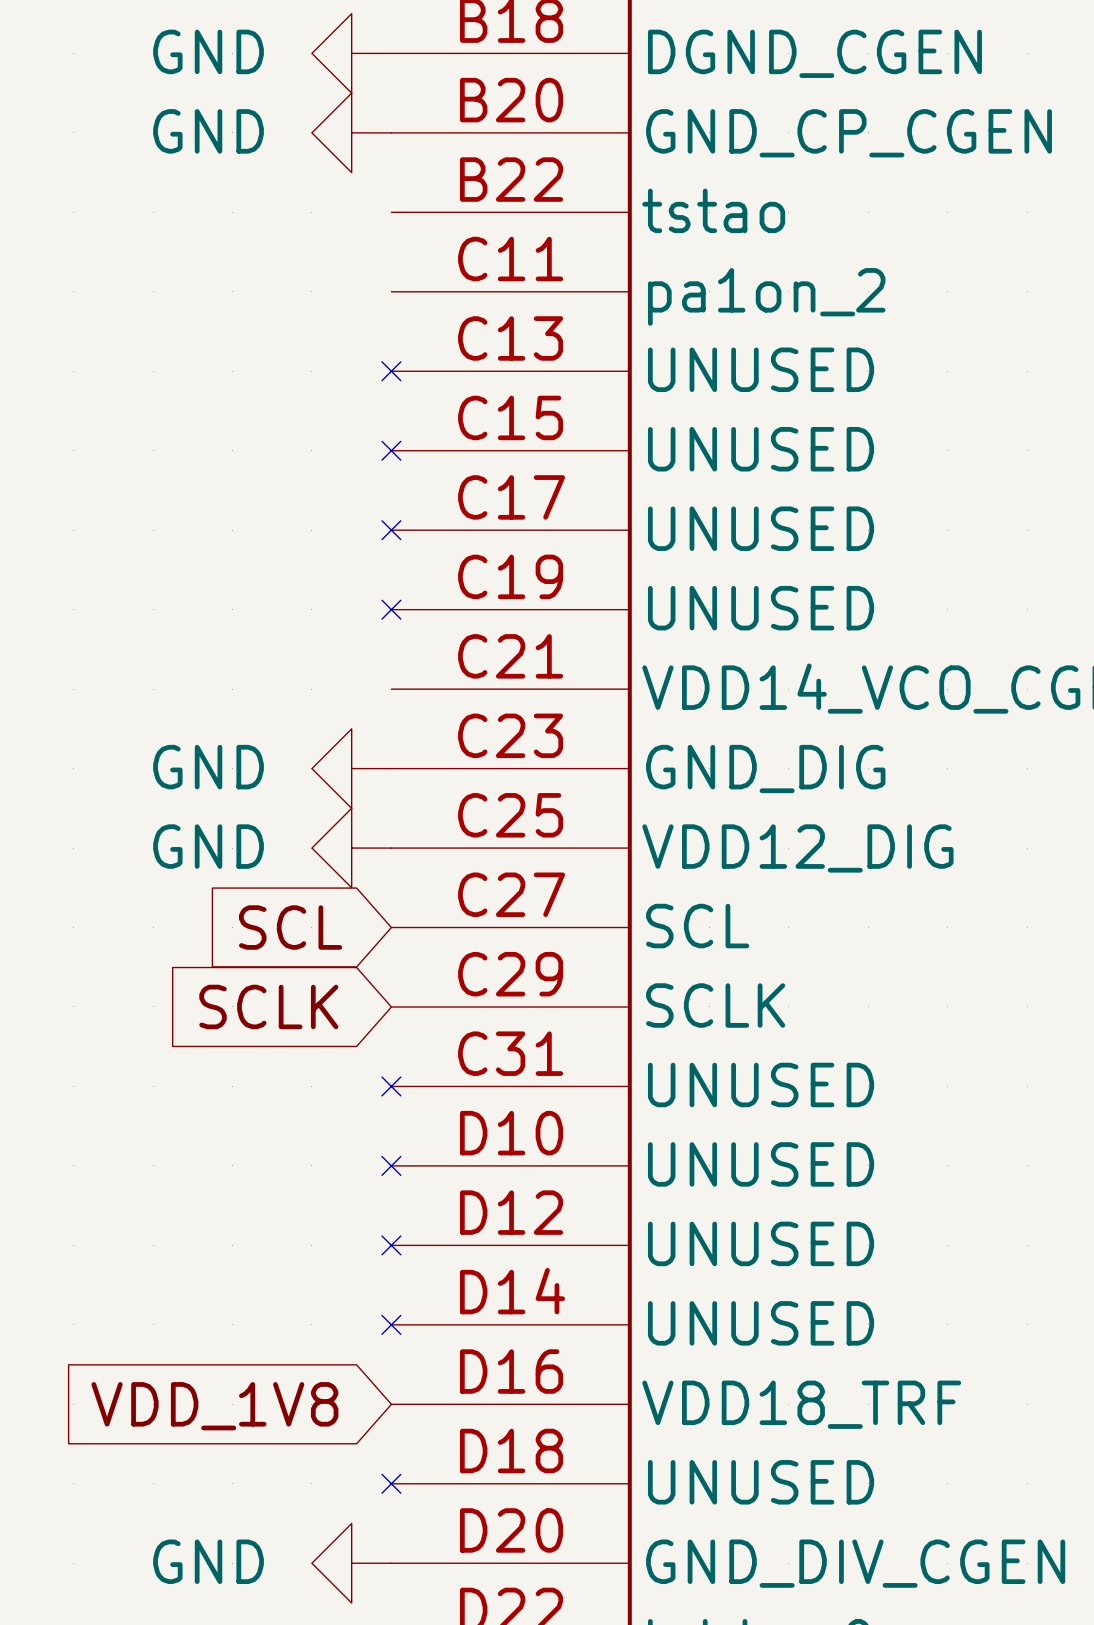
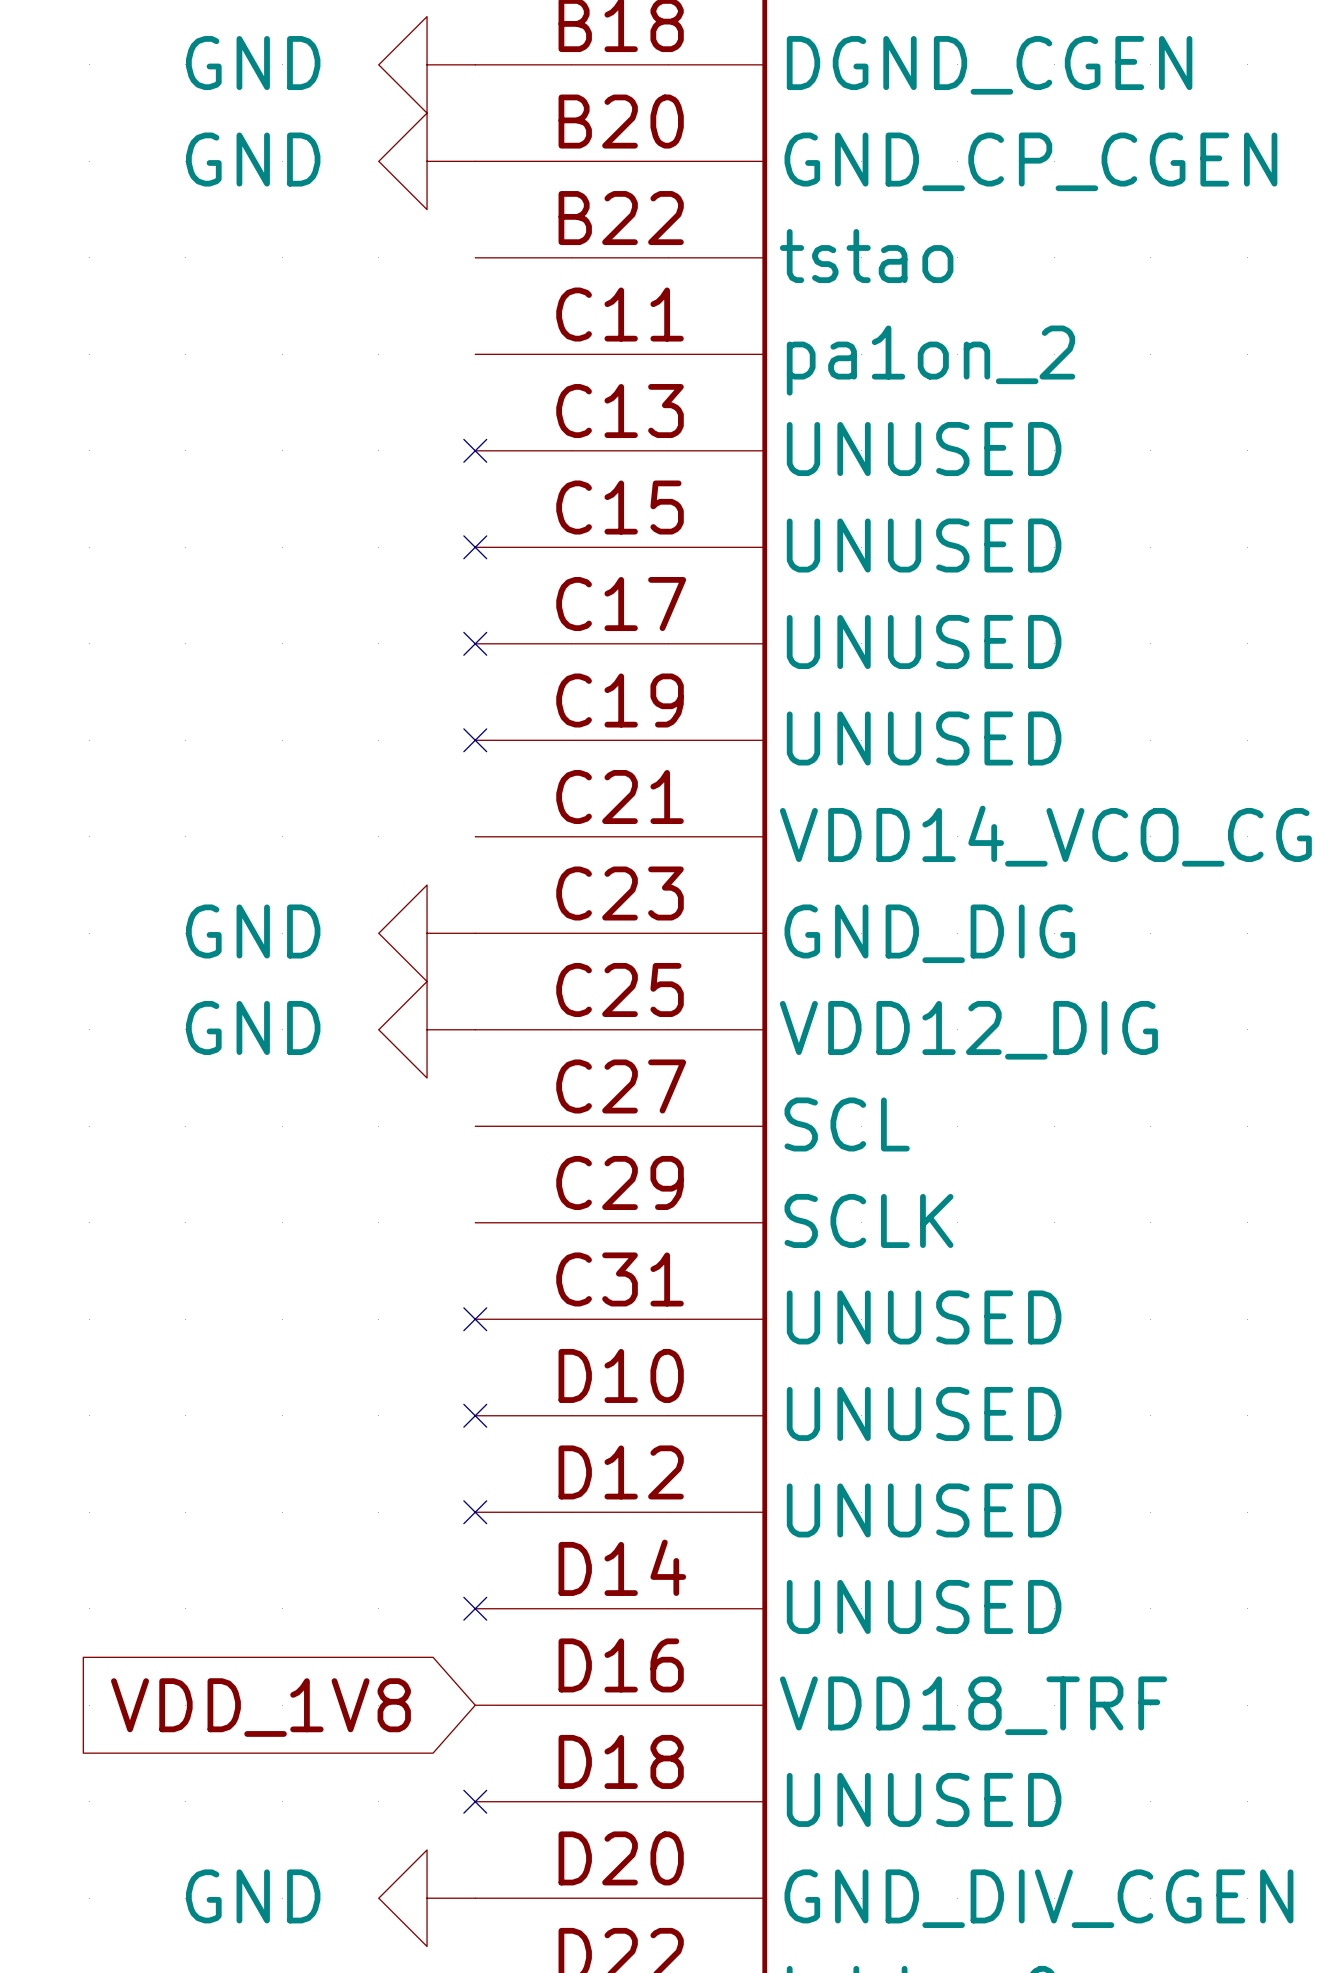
global label: SCL (290, 927) -> none
global label: SCLK (268, 1006) -> none

